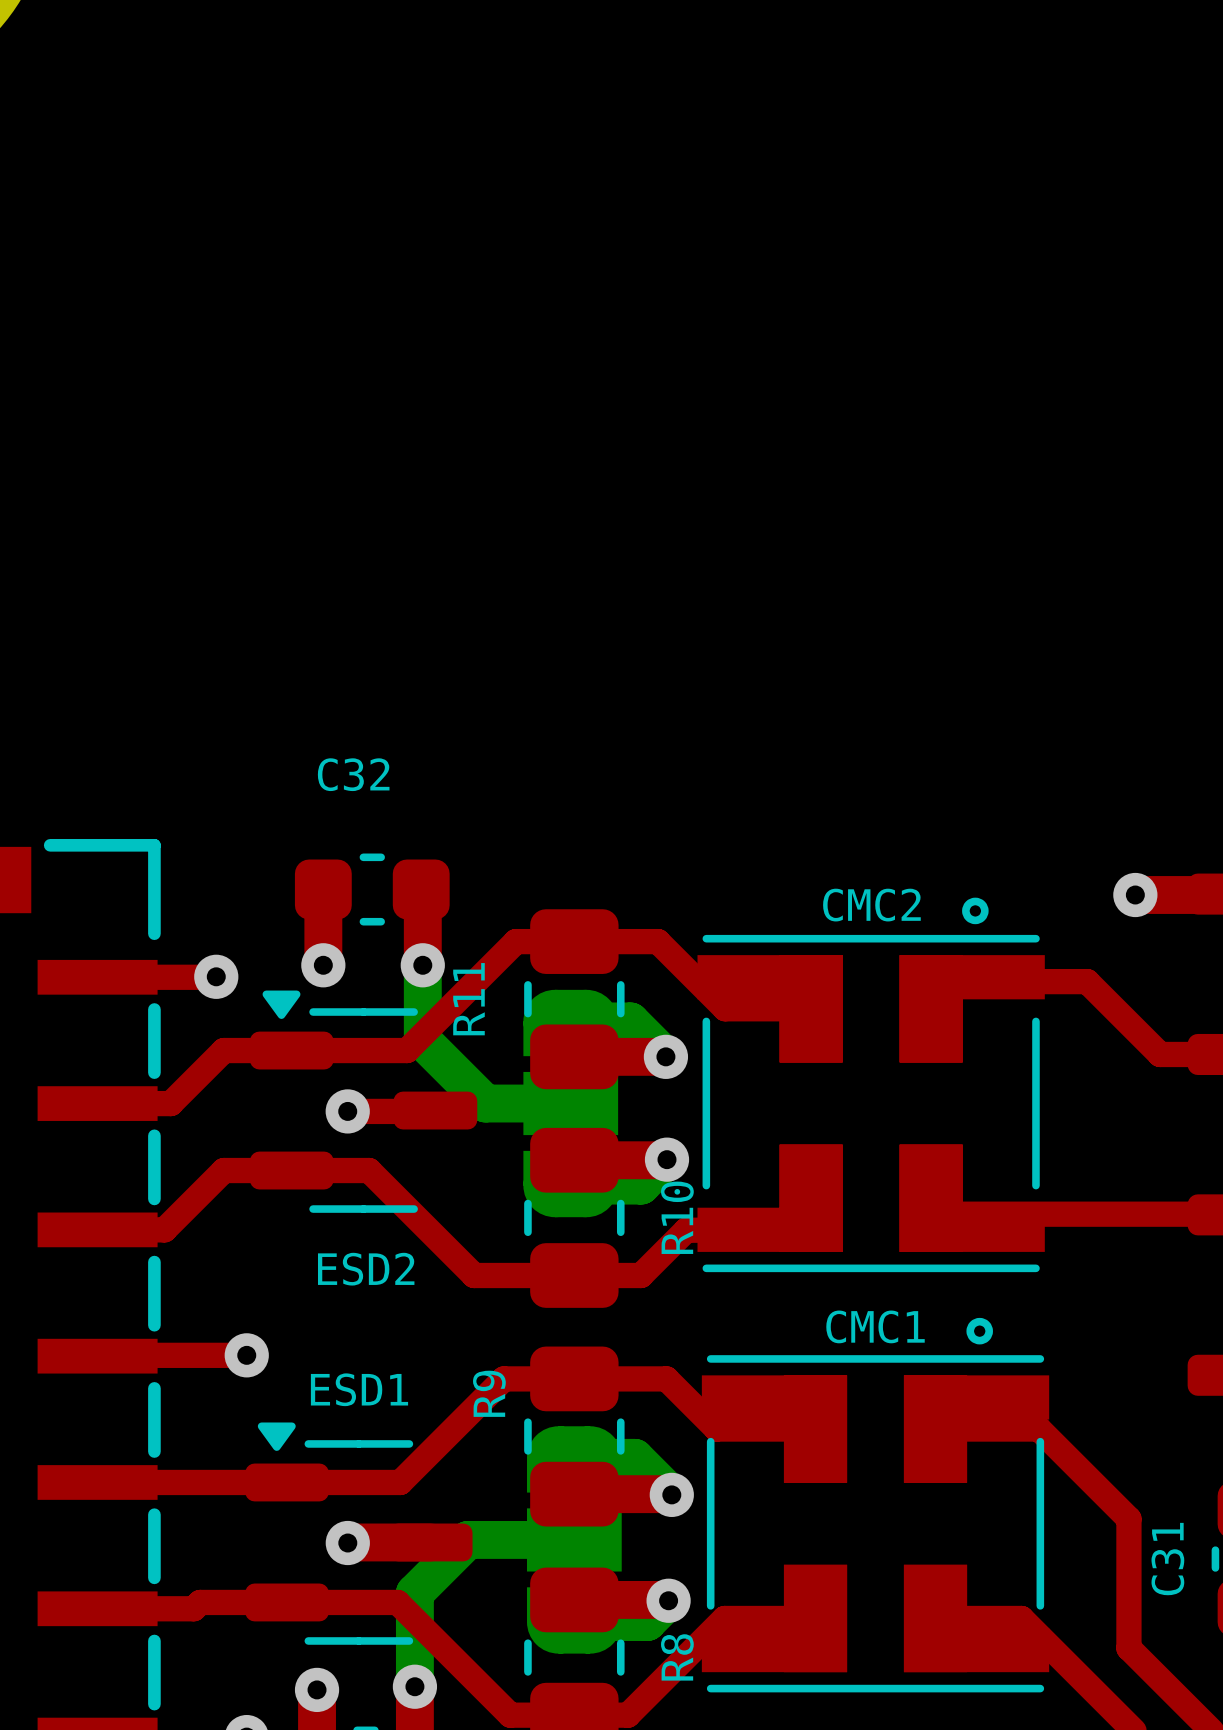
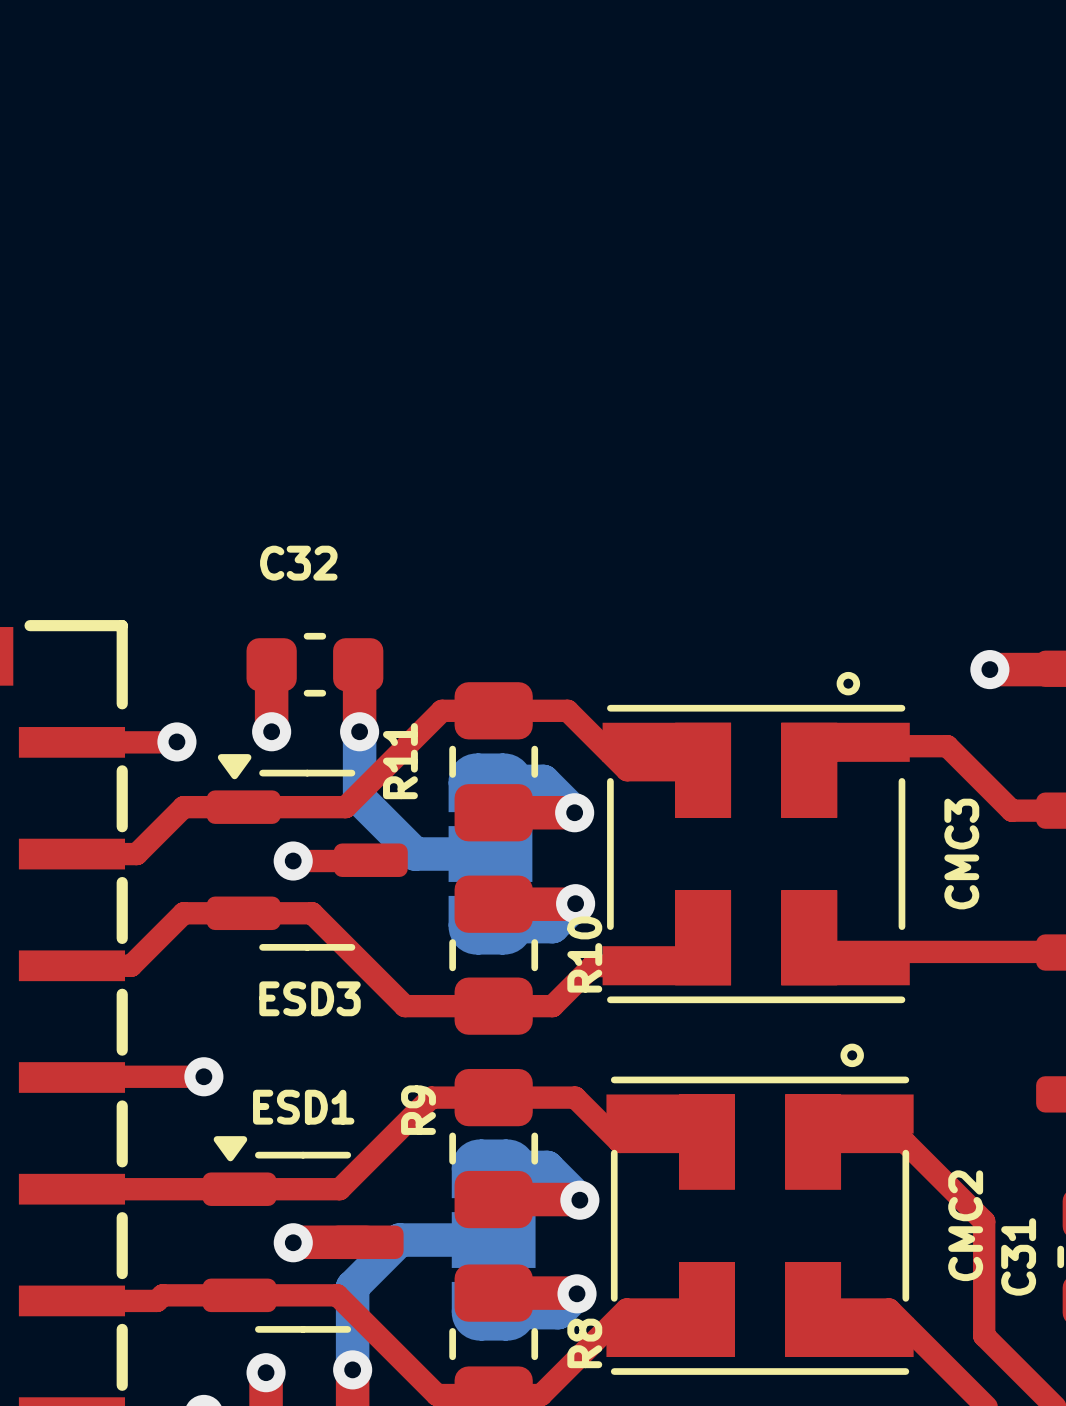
CMC2 name: CMC2 (871, 905) -> CMC3 (961, 854)
ESD2 name: ESD2 (366, 1269) -> ESD3 (310, 998)
CMC1 name: CMC1 (875, 1326) -> CMC2 (965, 1225)

